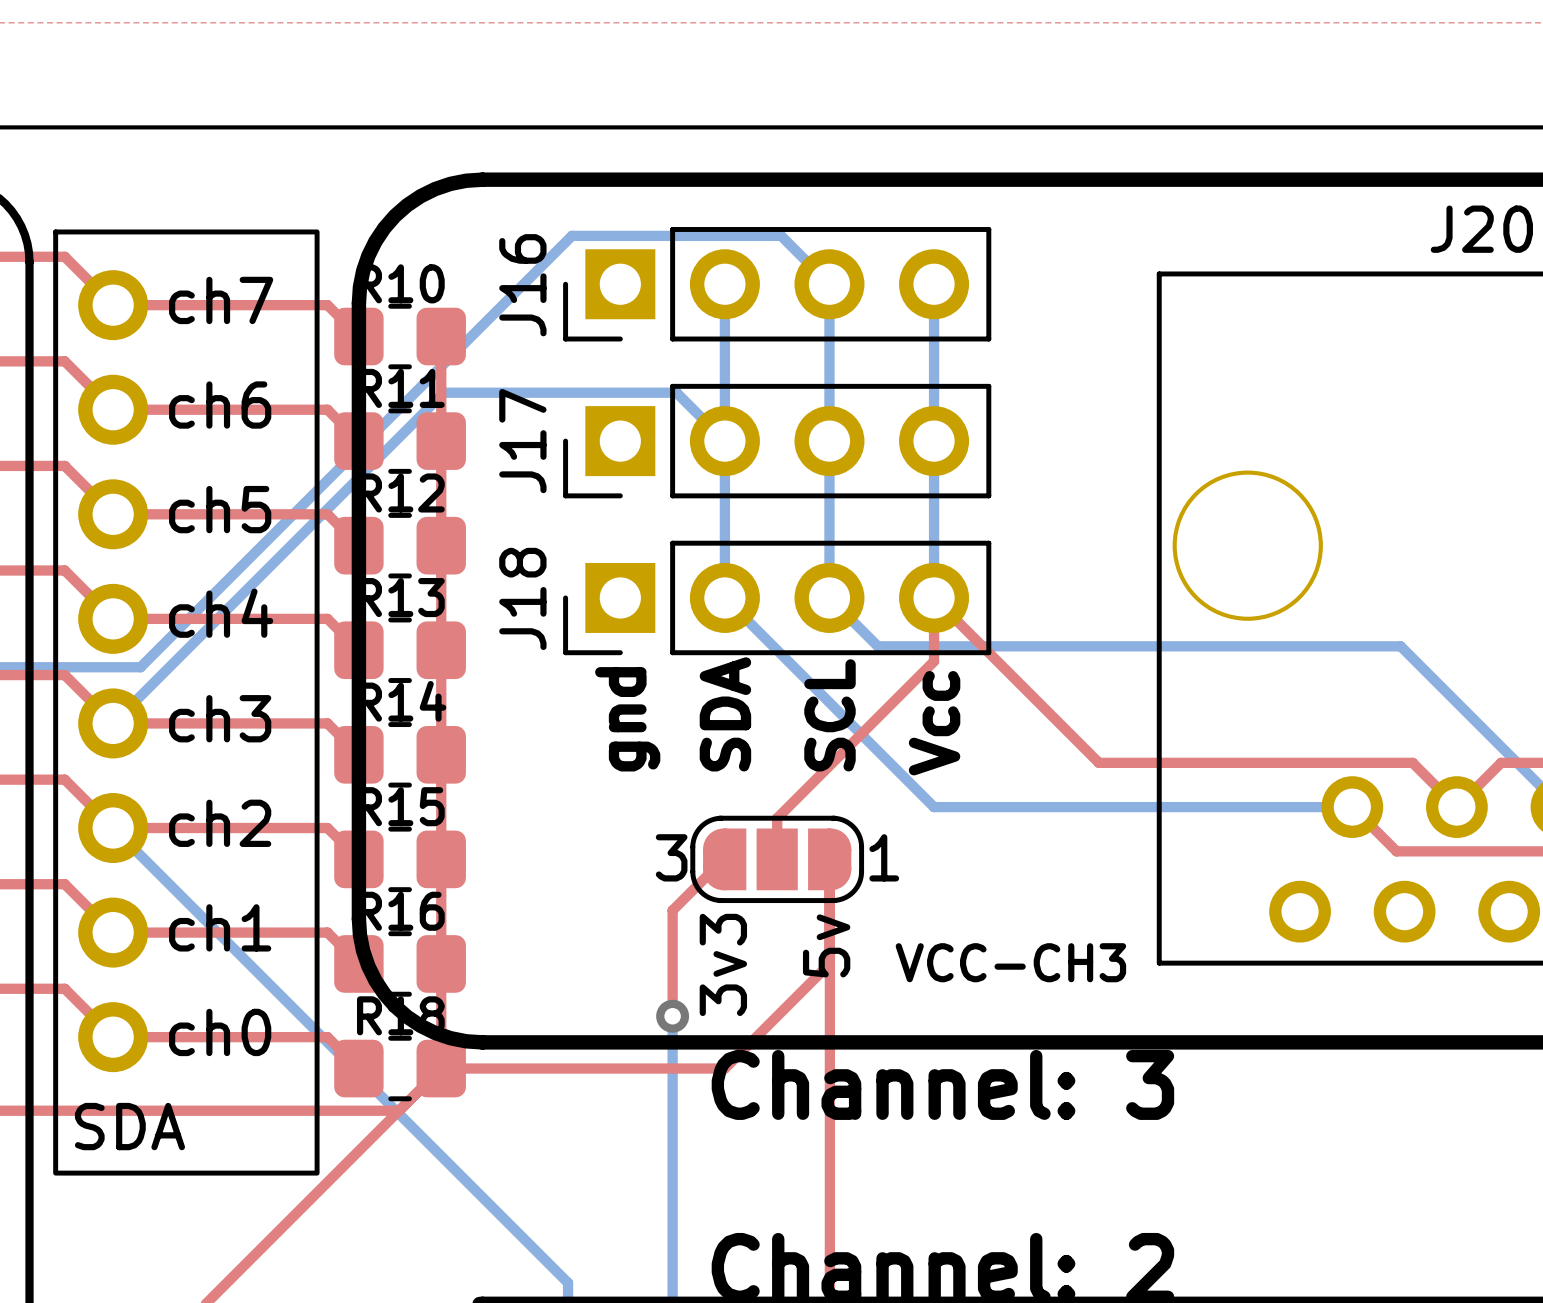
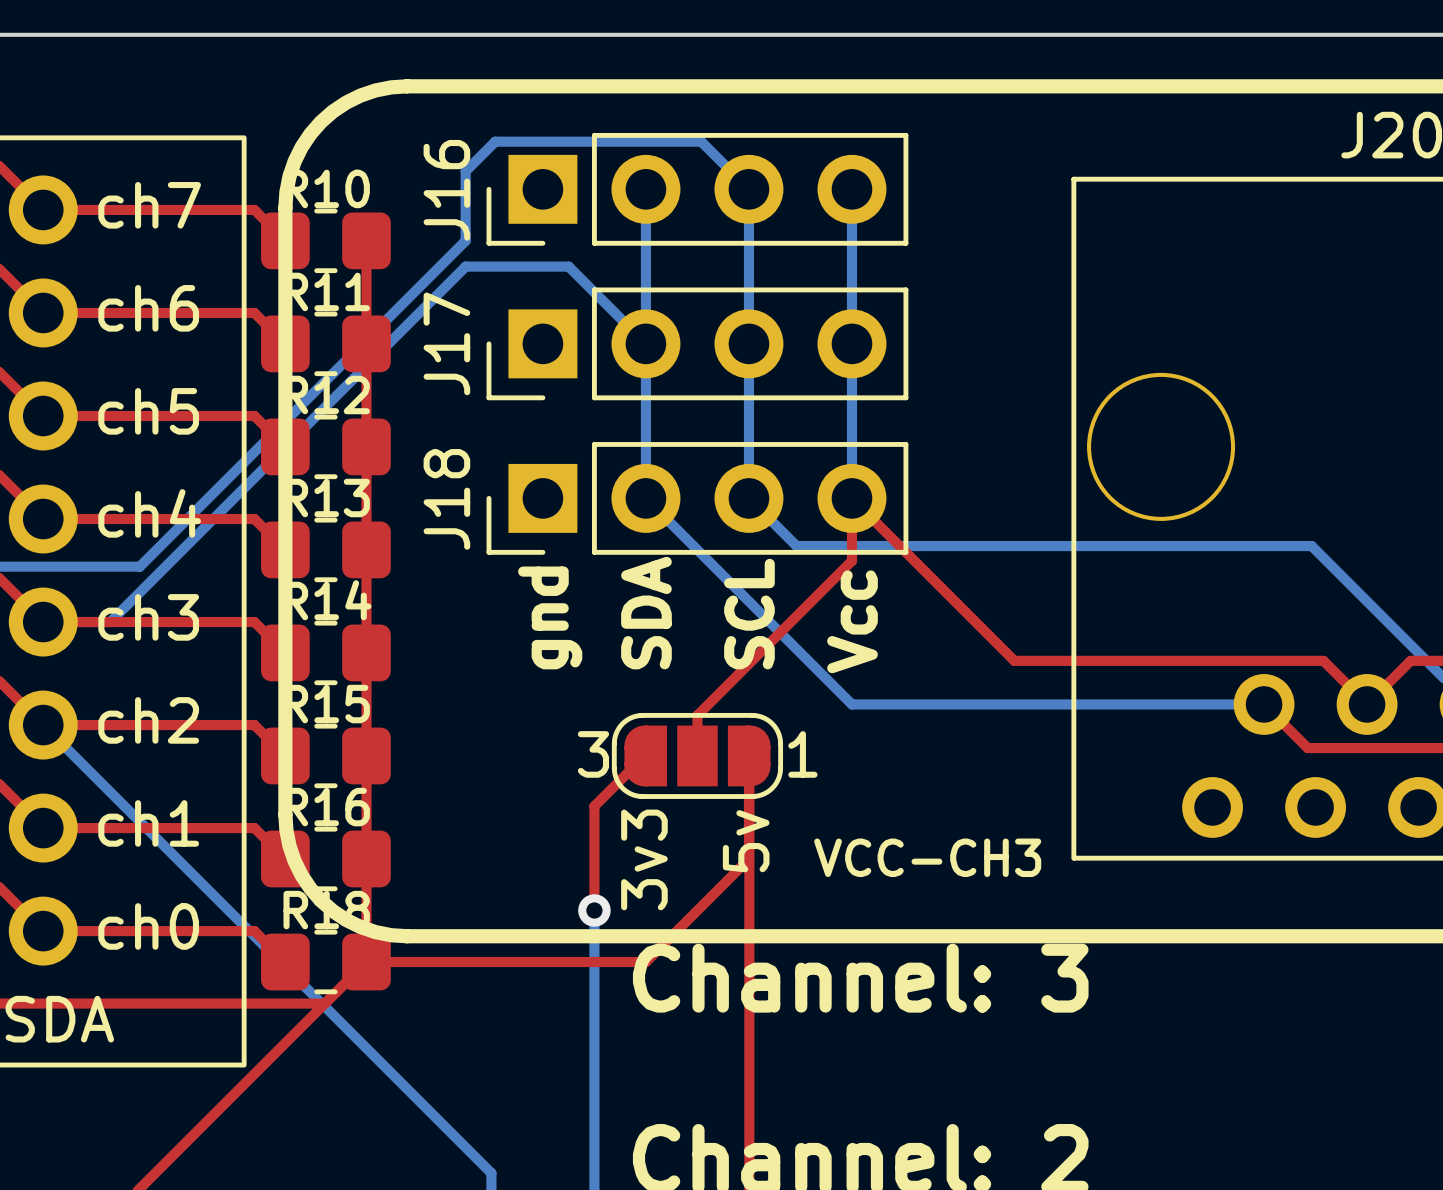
bottom track: (541, 265) (140, 667) -> (465, 171) (465, 240) (139, 566) (70, 566)
bottom track: (676, 392) (443, 392) (113, 723) -> (598, 296) (568, 266) (465, 266) (110, 622) (43, 622)

